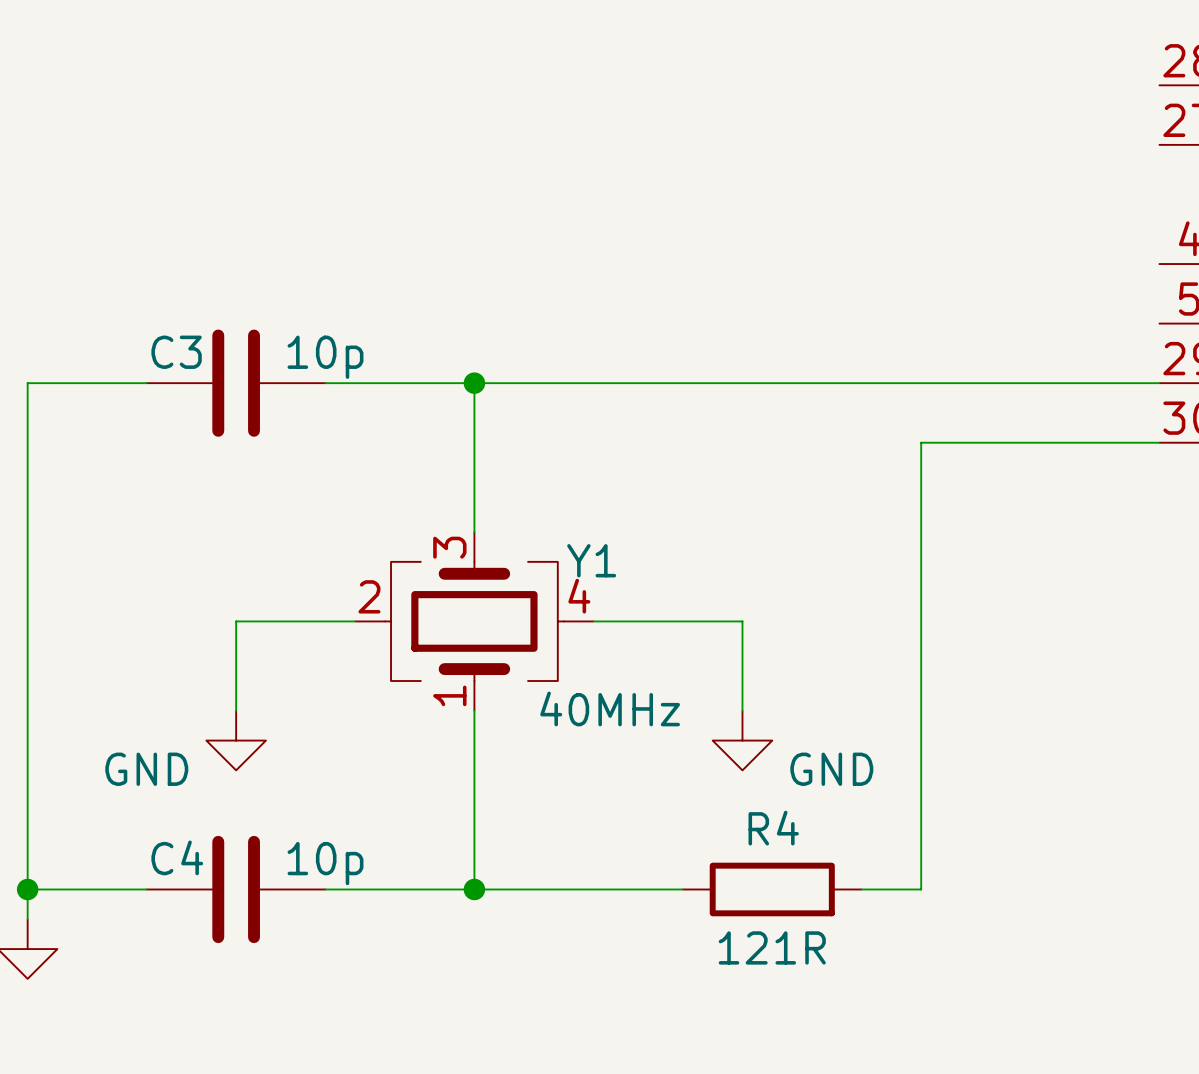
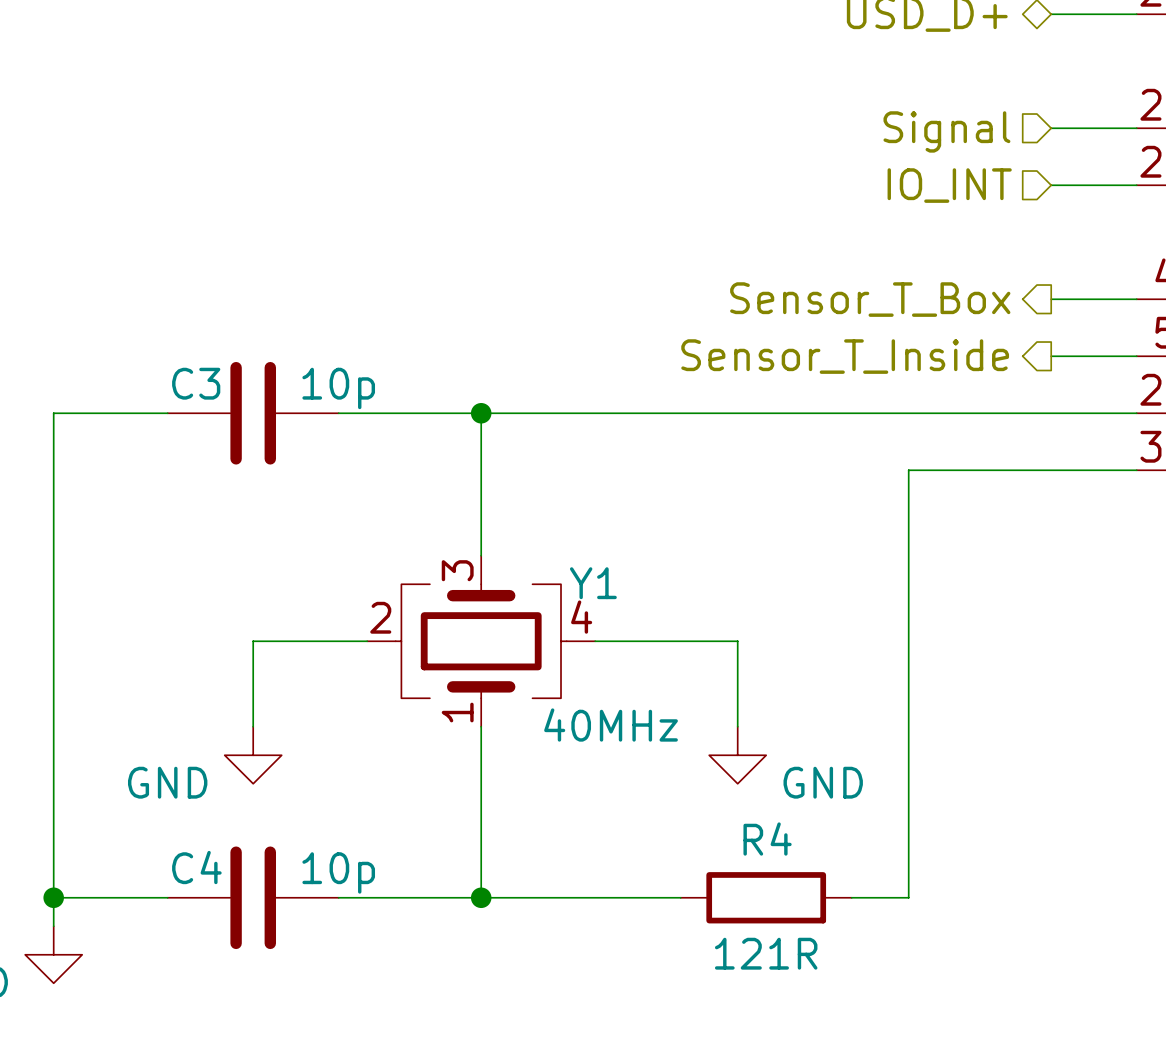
wire: none -> (1051, 128) (1136, 128)
hierarchical label: none -> Signal (946, 131)
wire: none -> (1051, 185) (1136, 185)
hierarchical label: none -> IO_INT (949, 185)
hierarchical label: none -> Sensor_T_Box (870, 299)
wire: none -> (1051, 299) (1136, 299)
hierarchical label: none -> Sensor_T_Inside (845, 356)
wire: none -> (1051, 356) (1136, 356)

